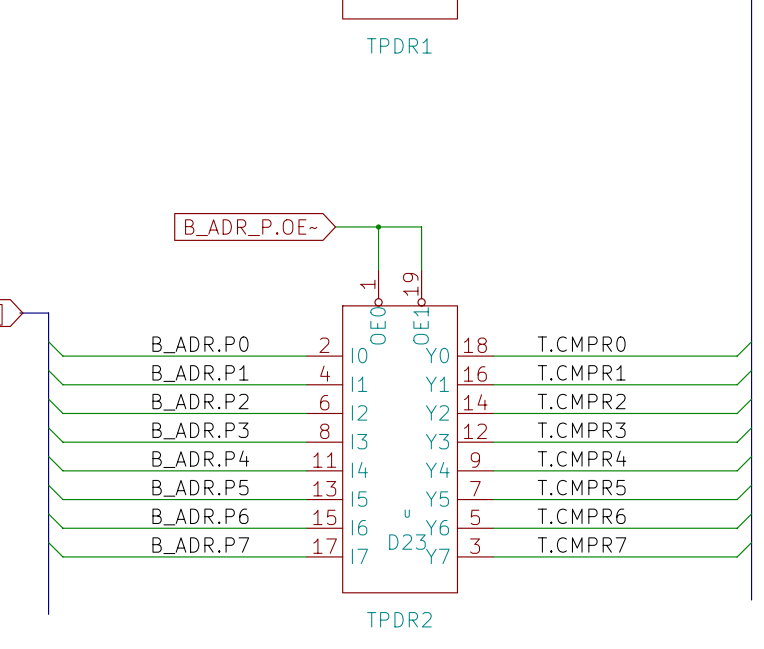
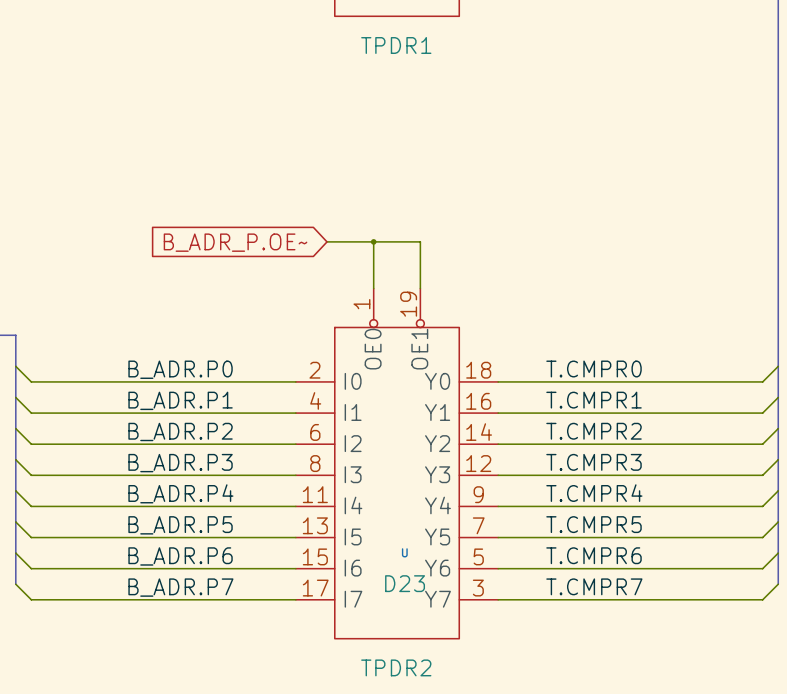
bus: (48, 542) (48, 614) -> none
bus: (751, 542) (751, 599) -> none

